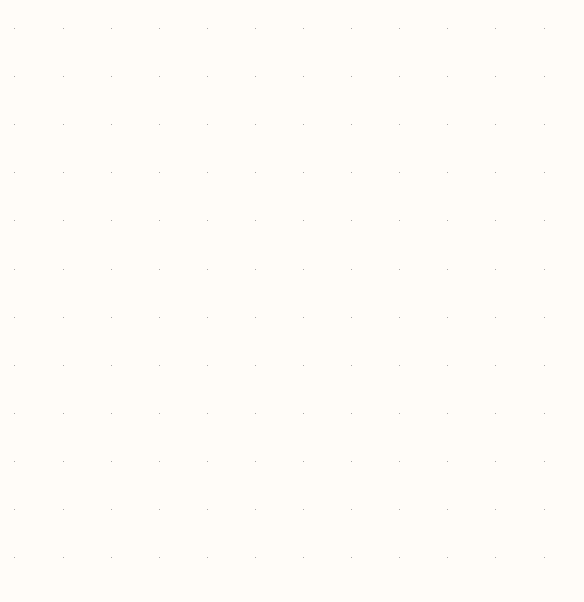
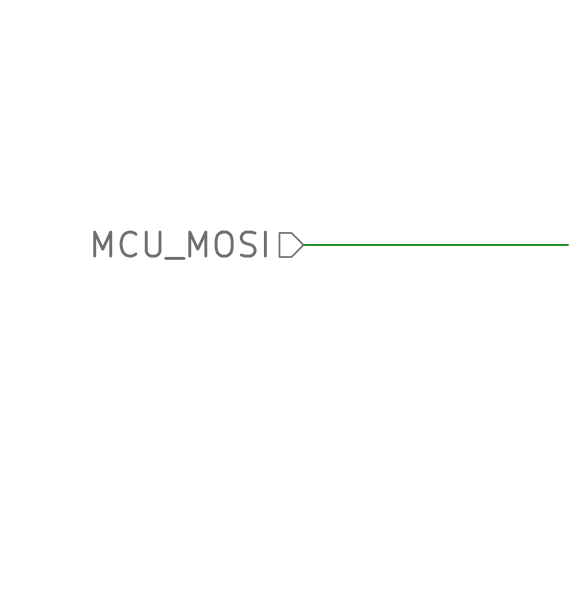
wire: none -> (303, 244) (568, 244)
hierarchical label: none -> MCU_MOSI (180, 245)

